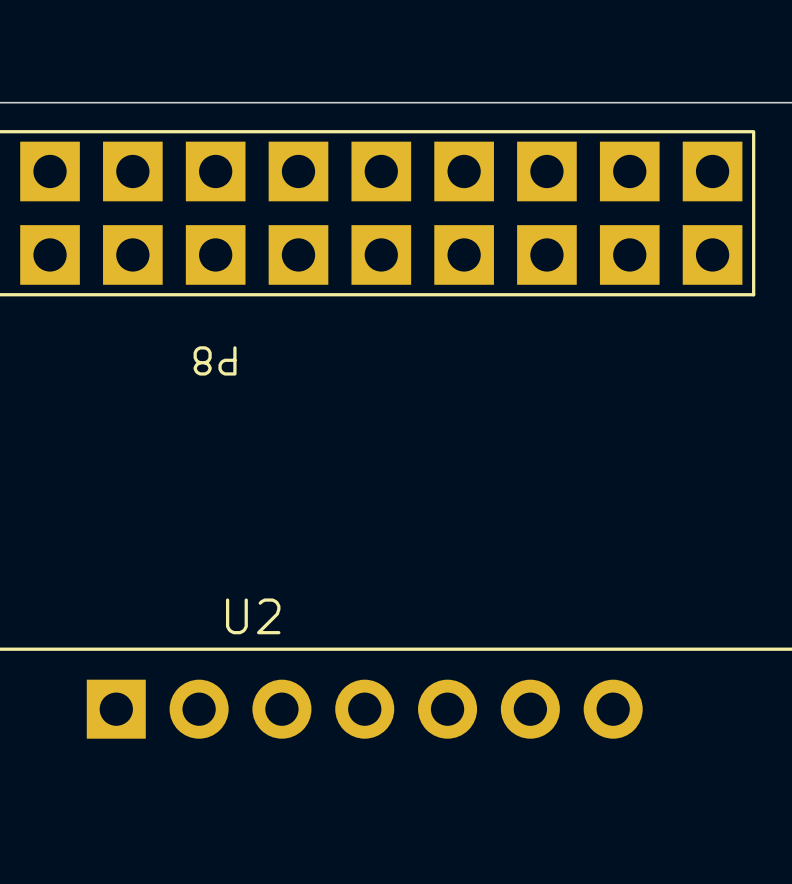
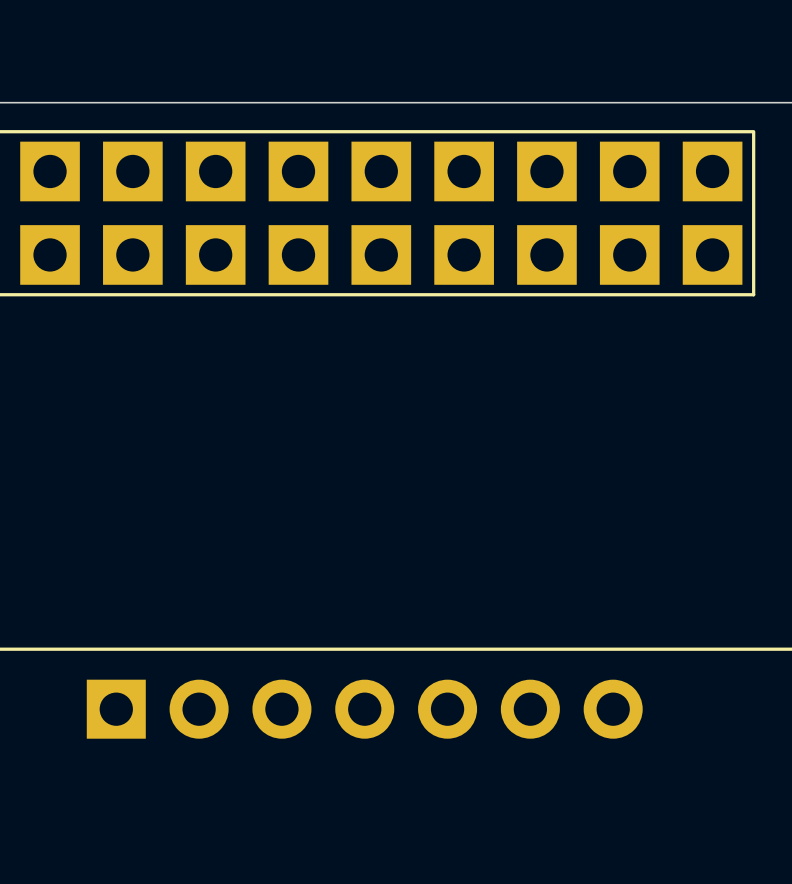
P8 name: P8 (215, 360) -> none
U2 name: U2 (253, 616) -> none

